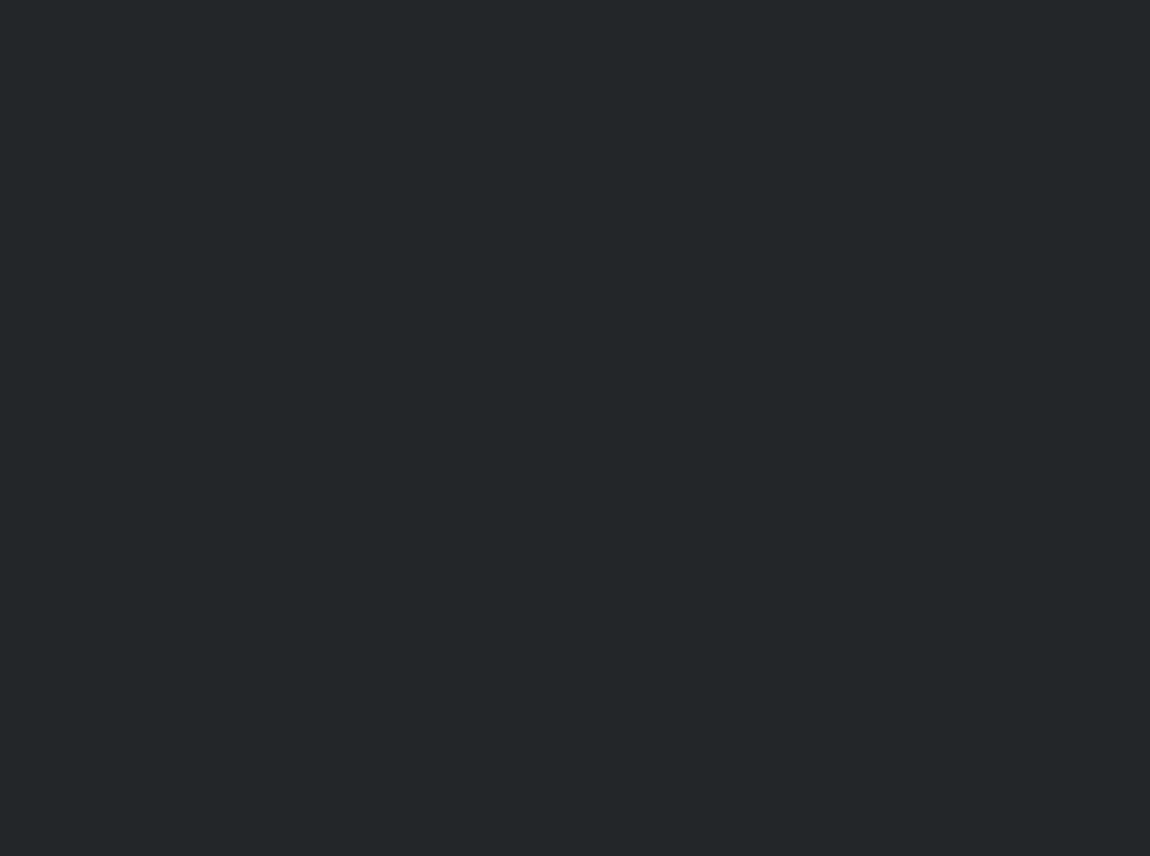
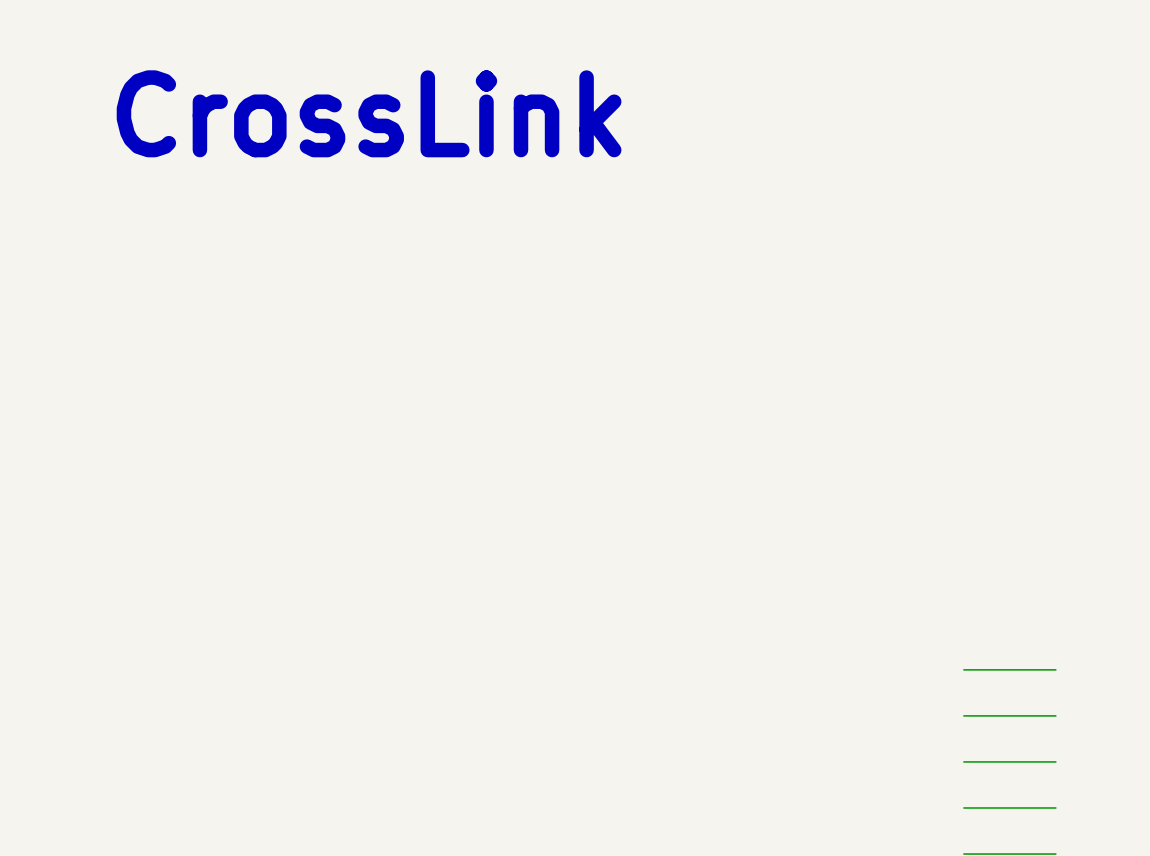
text: none -> CrossLink (369, 113)
wire: none -> (963, 669) (1055, 669)
wire: none -> (963, 715) (1055, 715)
wire: none -> (963, 761) (1055, 761)
wire: none -> (963, 807) (1055, 807)
wire: none -> (963, 854) (1055, 854)

